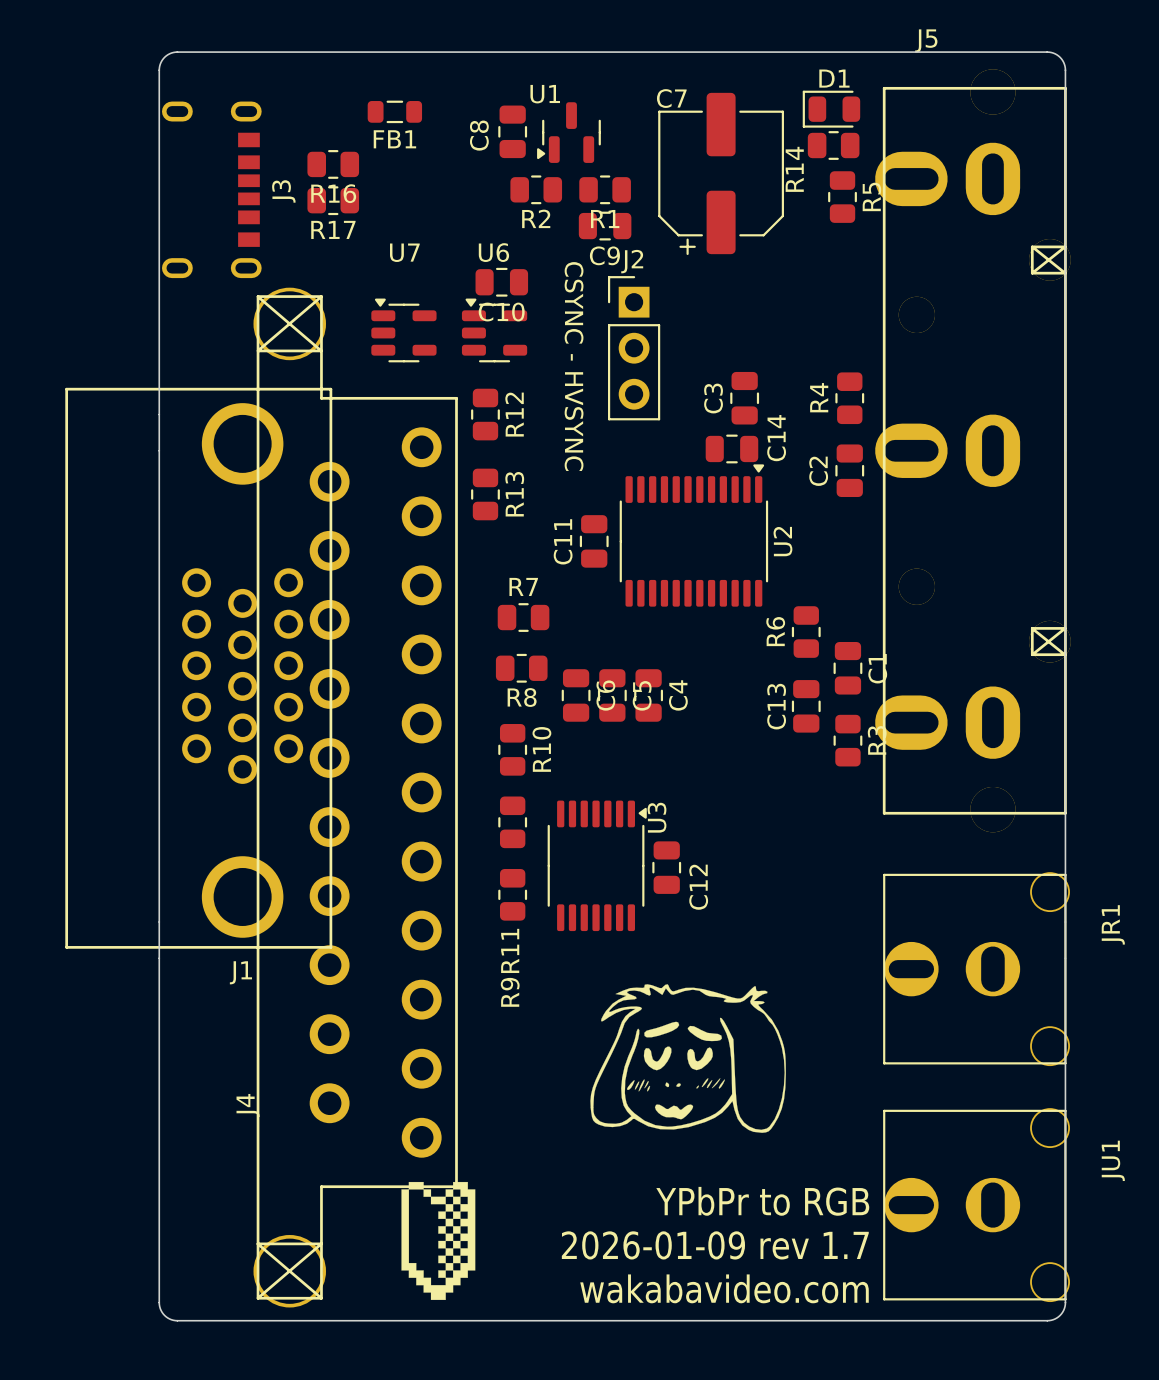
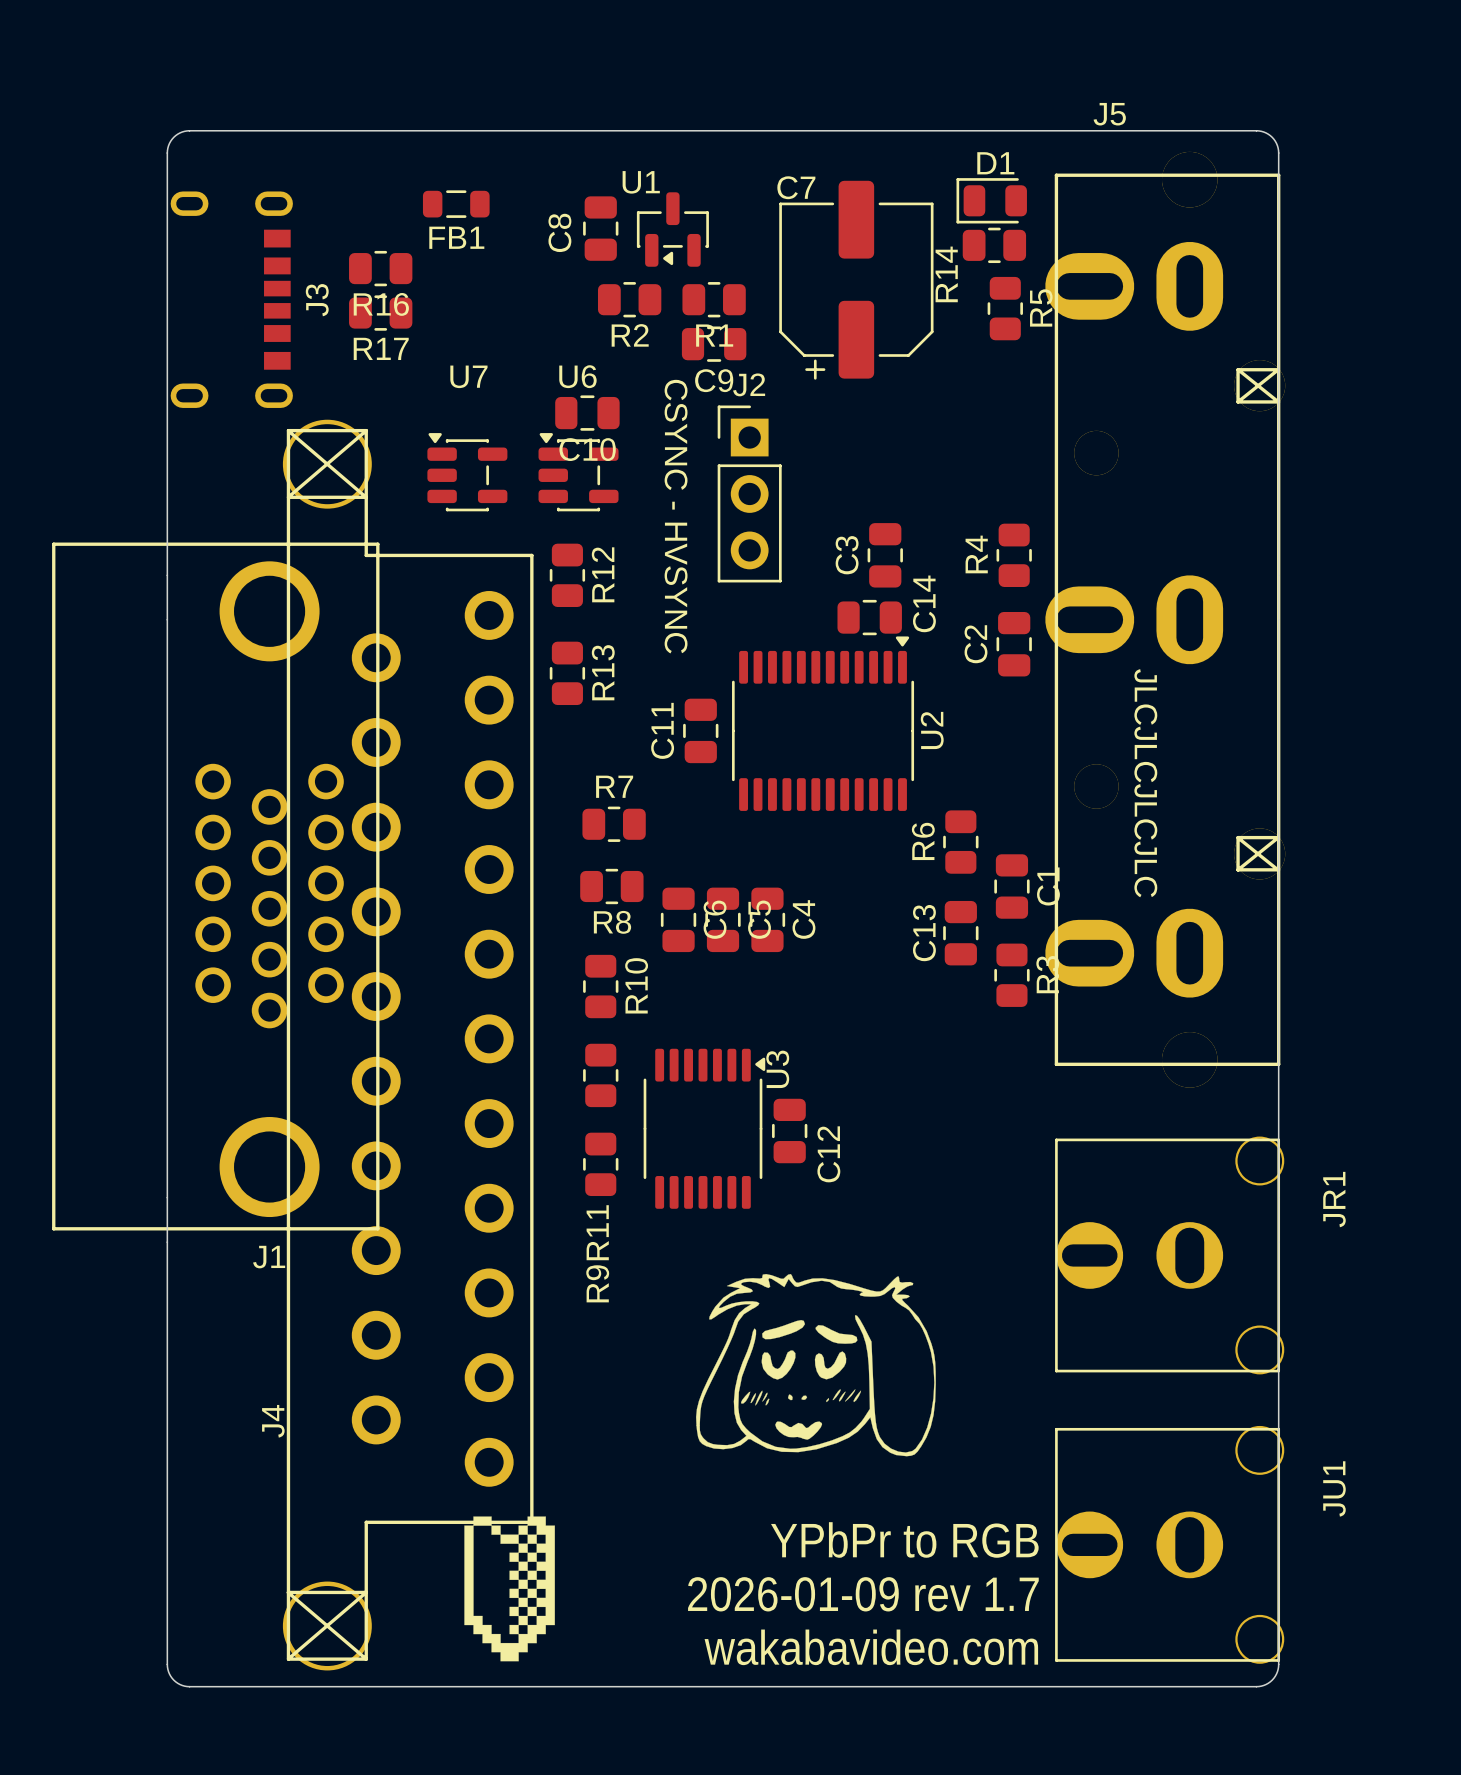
U1 footprint: [537, 102, 601, 163] -> [636, 192, 709, 267]
U7 footprint: [371, 298, 437, 363] -> [427, 433, 508, 512]
U6 footprint: [461, 298, 528, 363] -> [538, 433, 619, 512]
text: none -> JLCJLCJLCJLC (1145, 783)

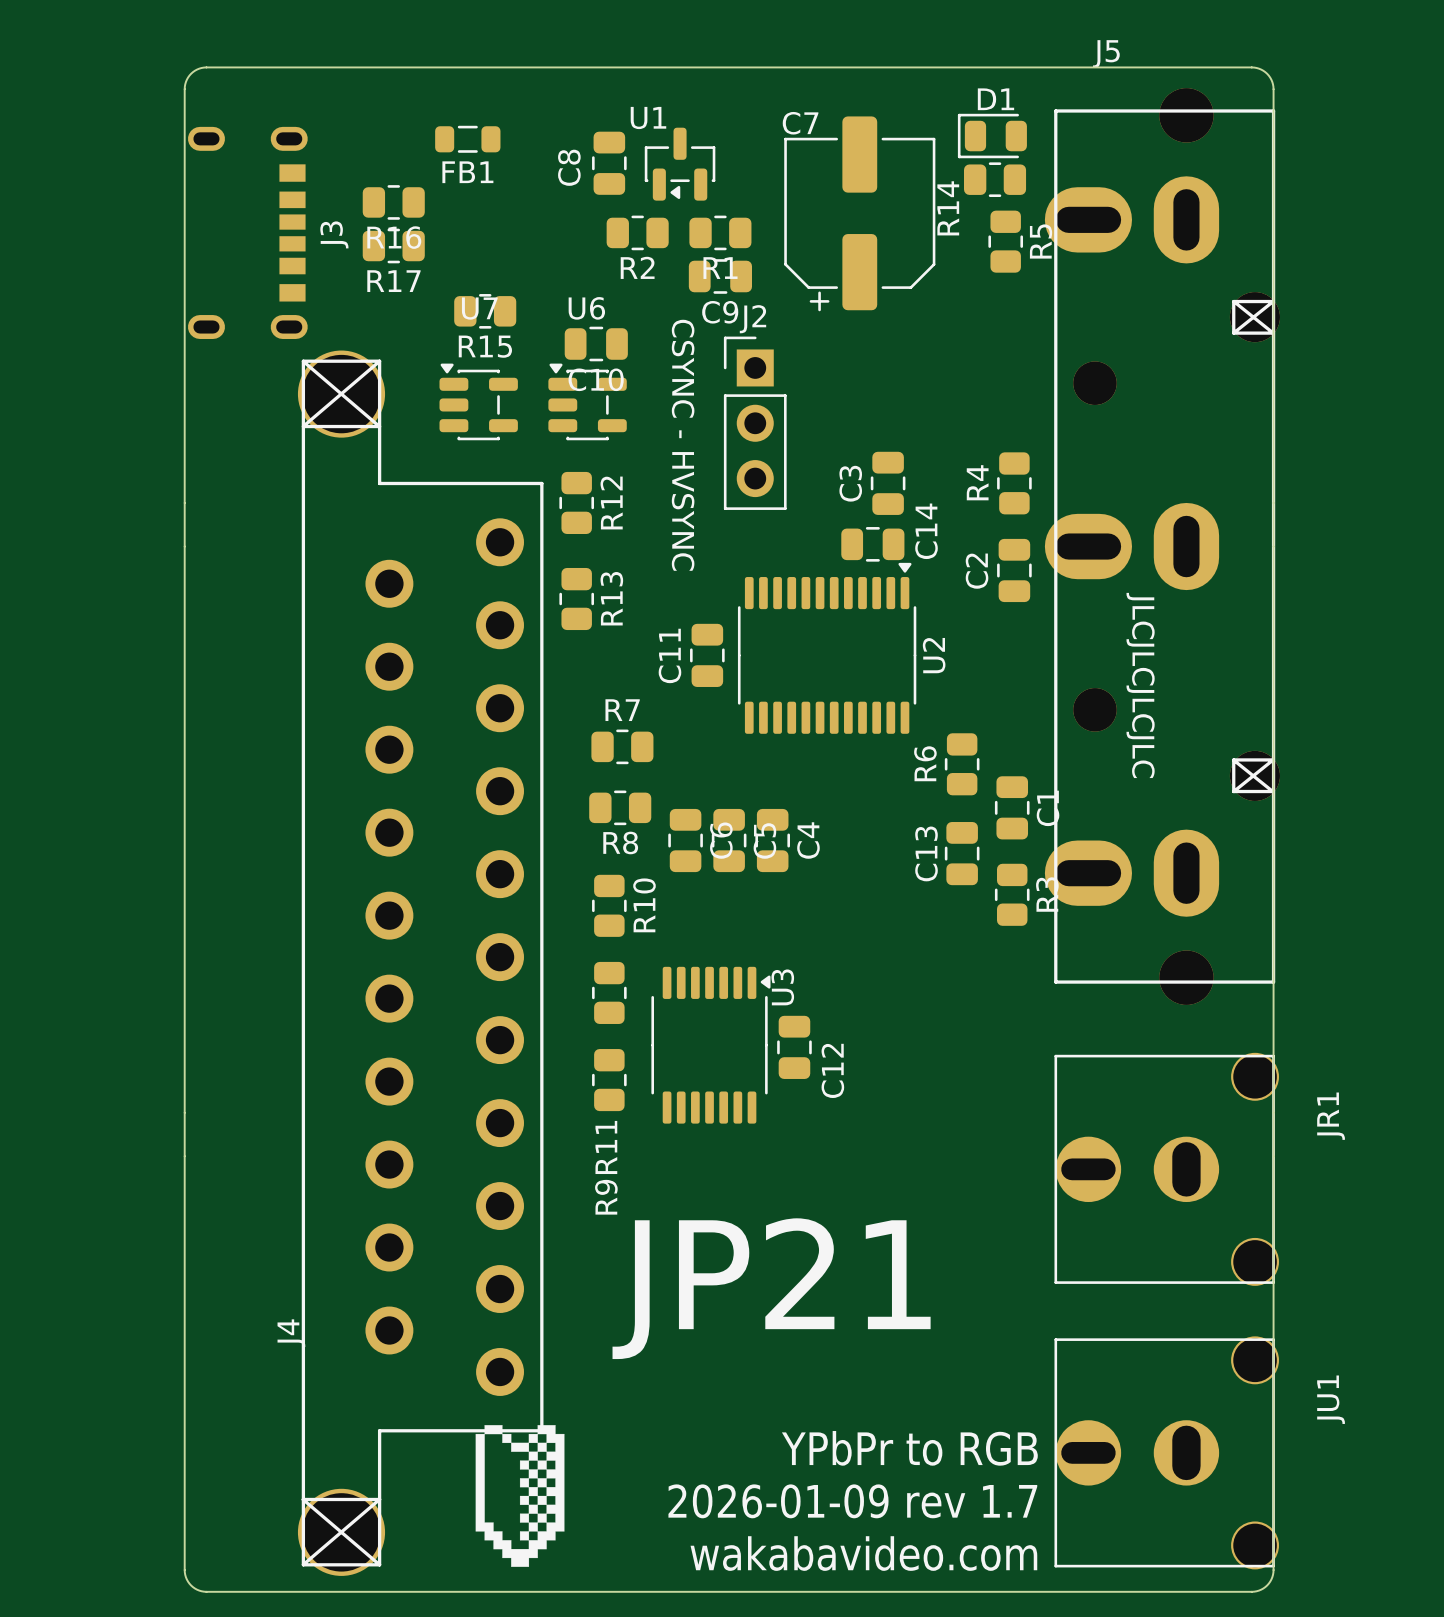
R15: none -> (485, 311)
J1: (215, 886) -> none
drawing: [696, 1274, 936, 1457] -> none
text: none -> JP21 (771, 1288)

